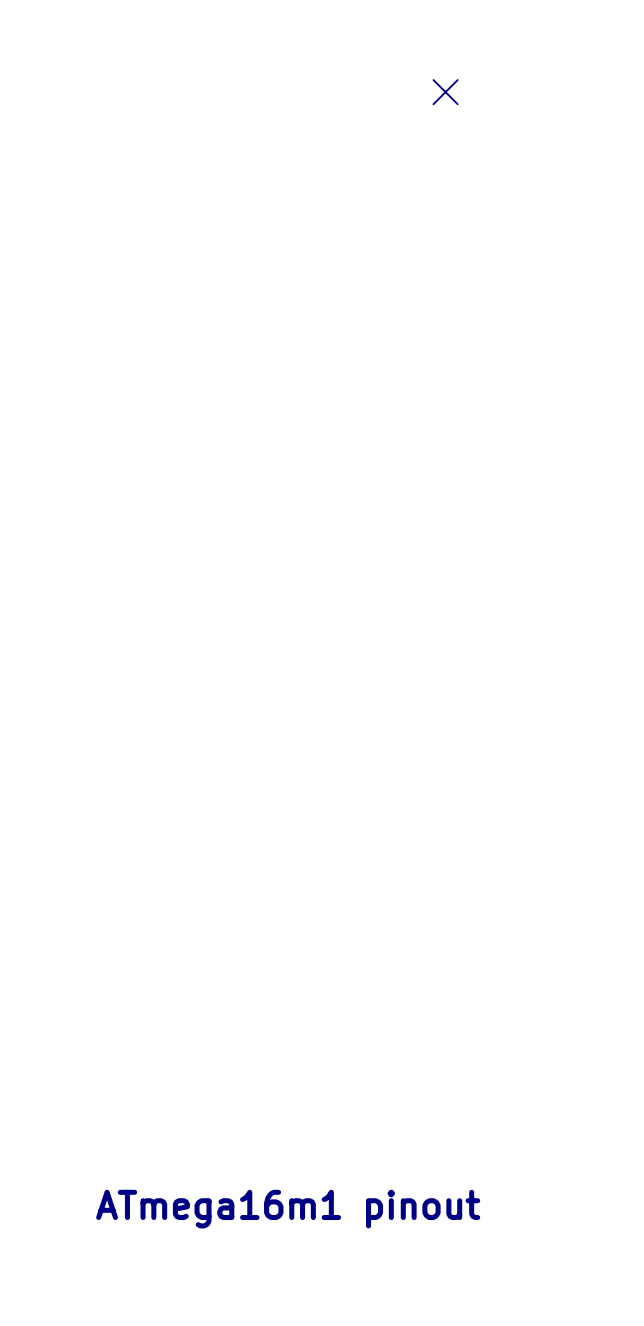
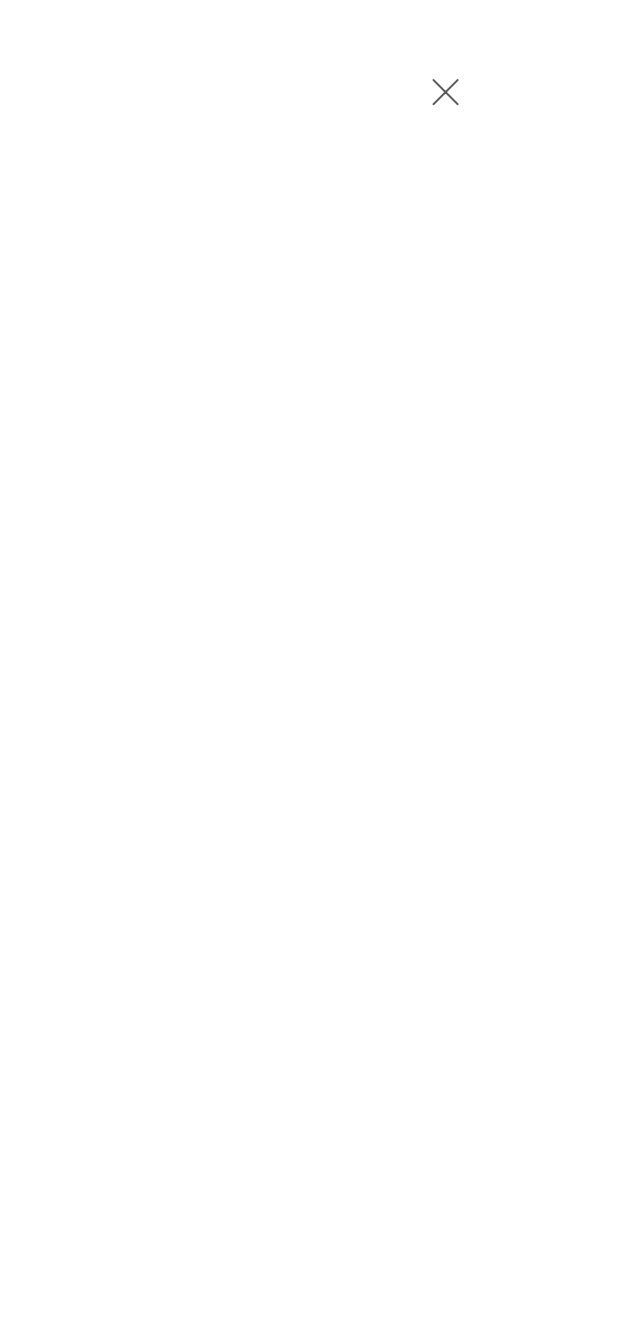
text: ATmega16m1 pinout (288, 1209) -> none

